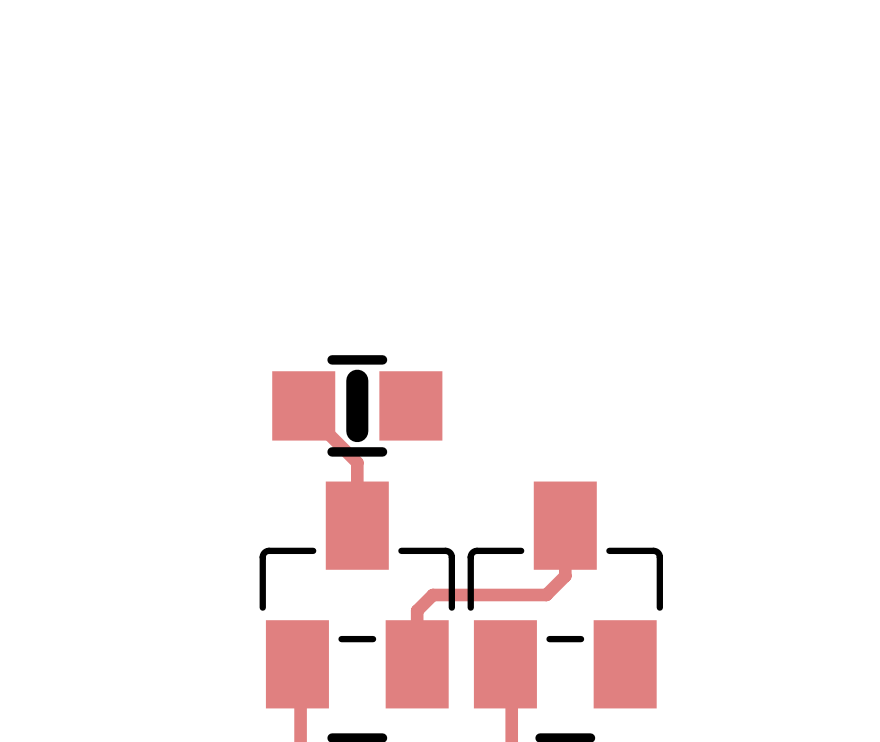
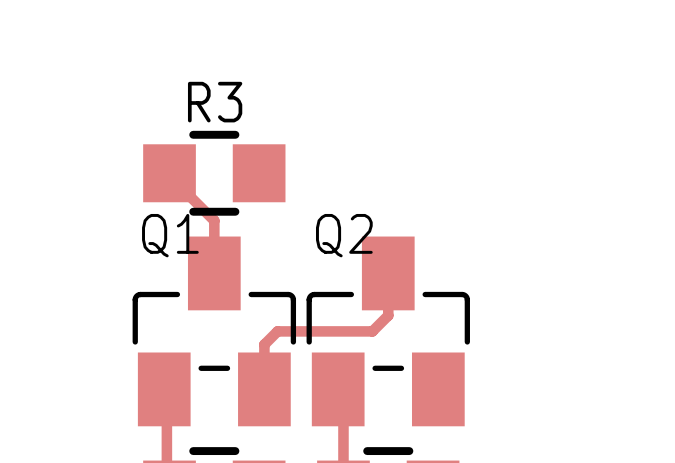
part: (357, 405) -> none
R3: none -> (214, 173)
Q1 name: none -> Q1 (170, 235)
Q2 name: none -> Q2 (344, 235)

